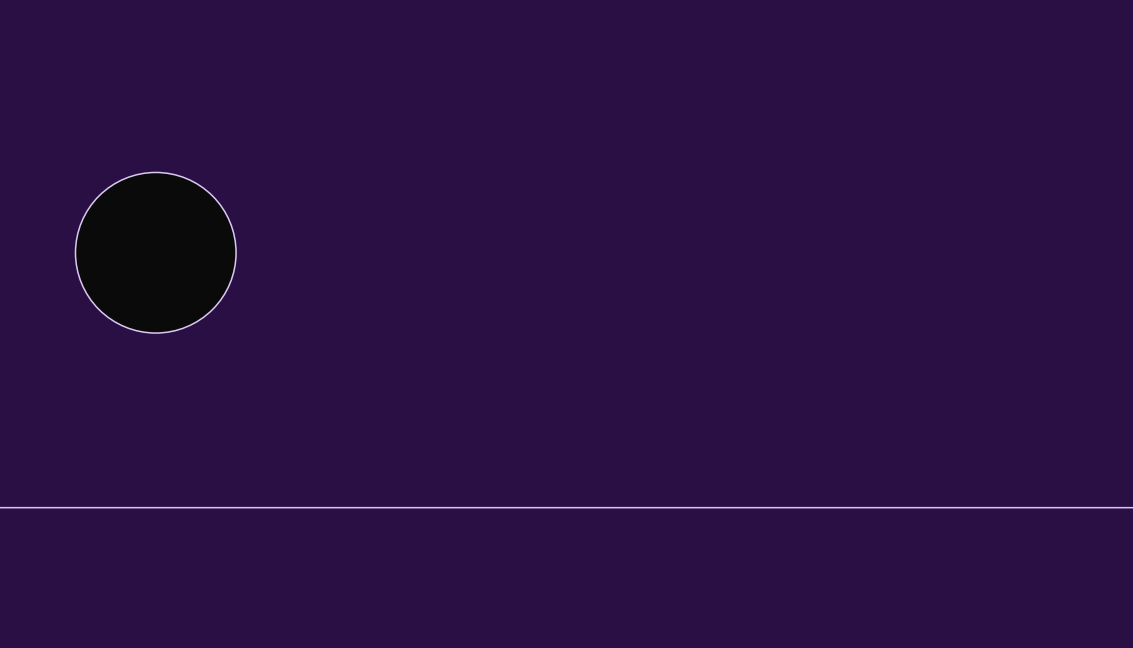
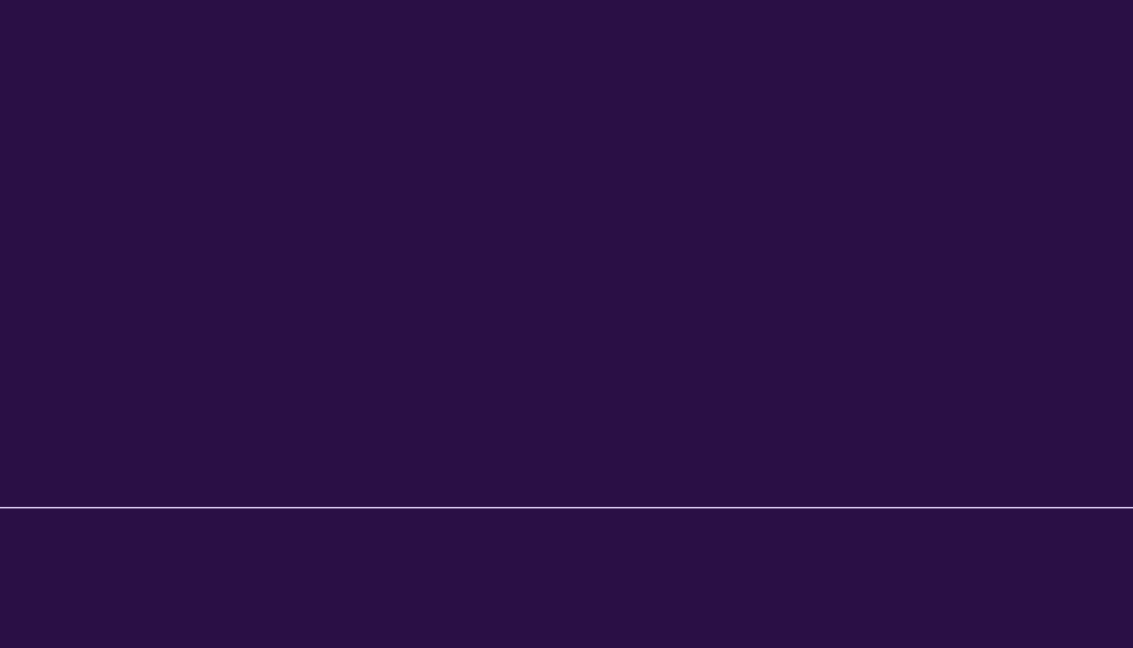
hole: (155, 252) -> none

